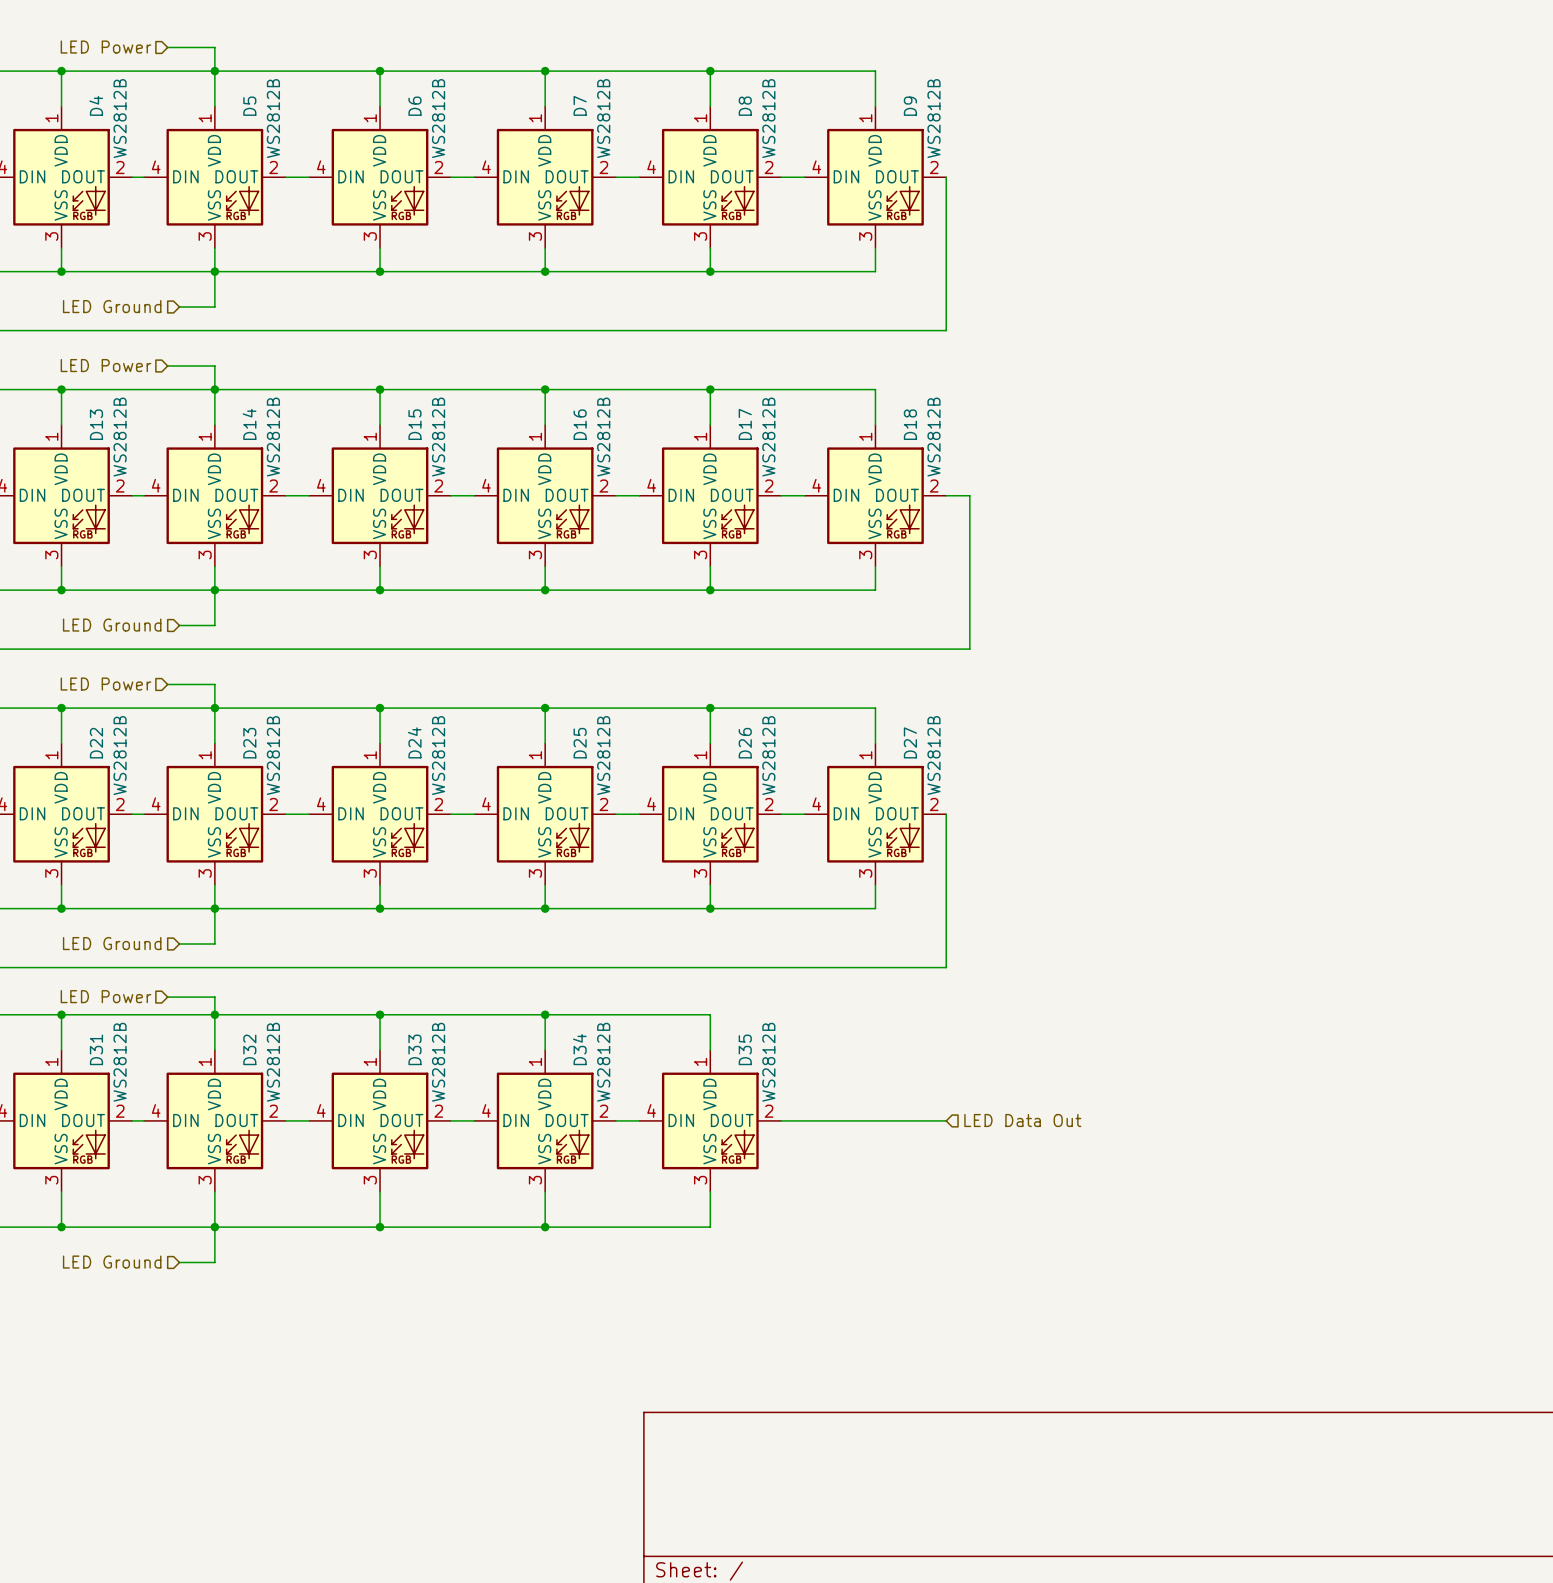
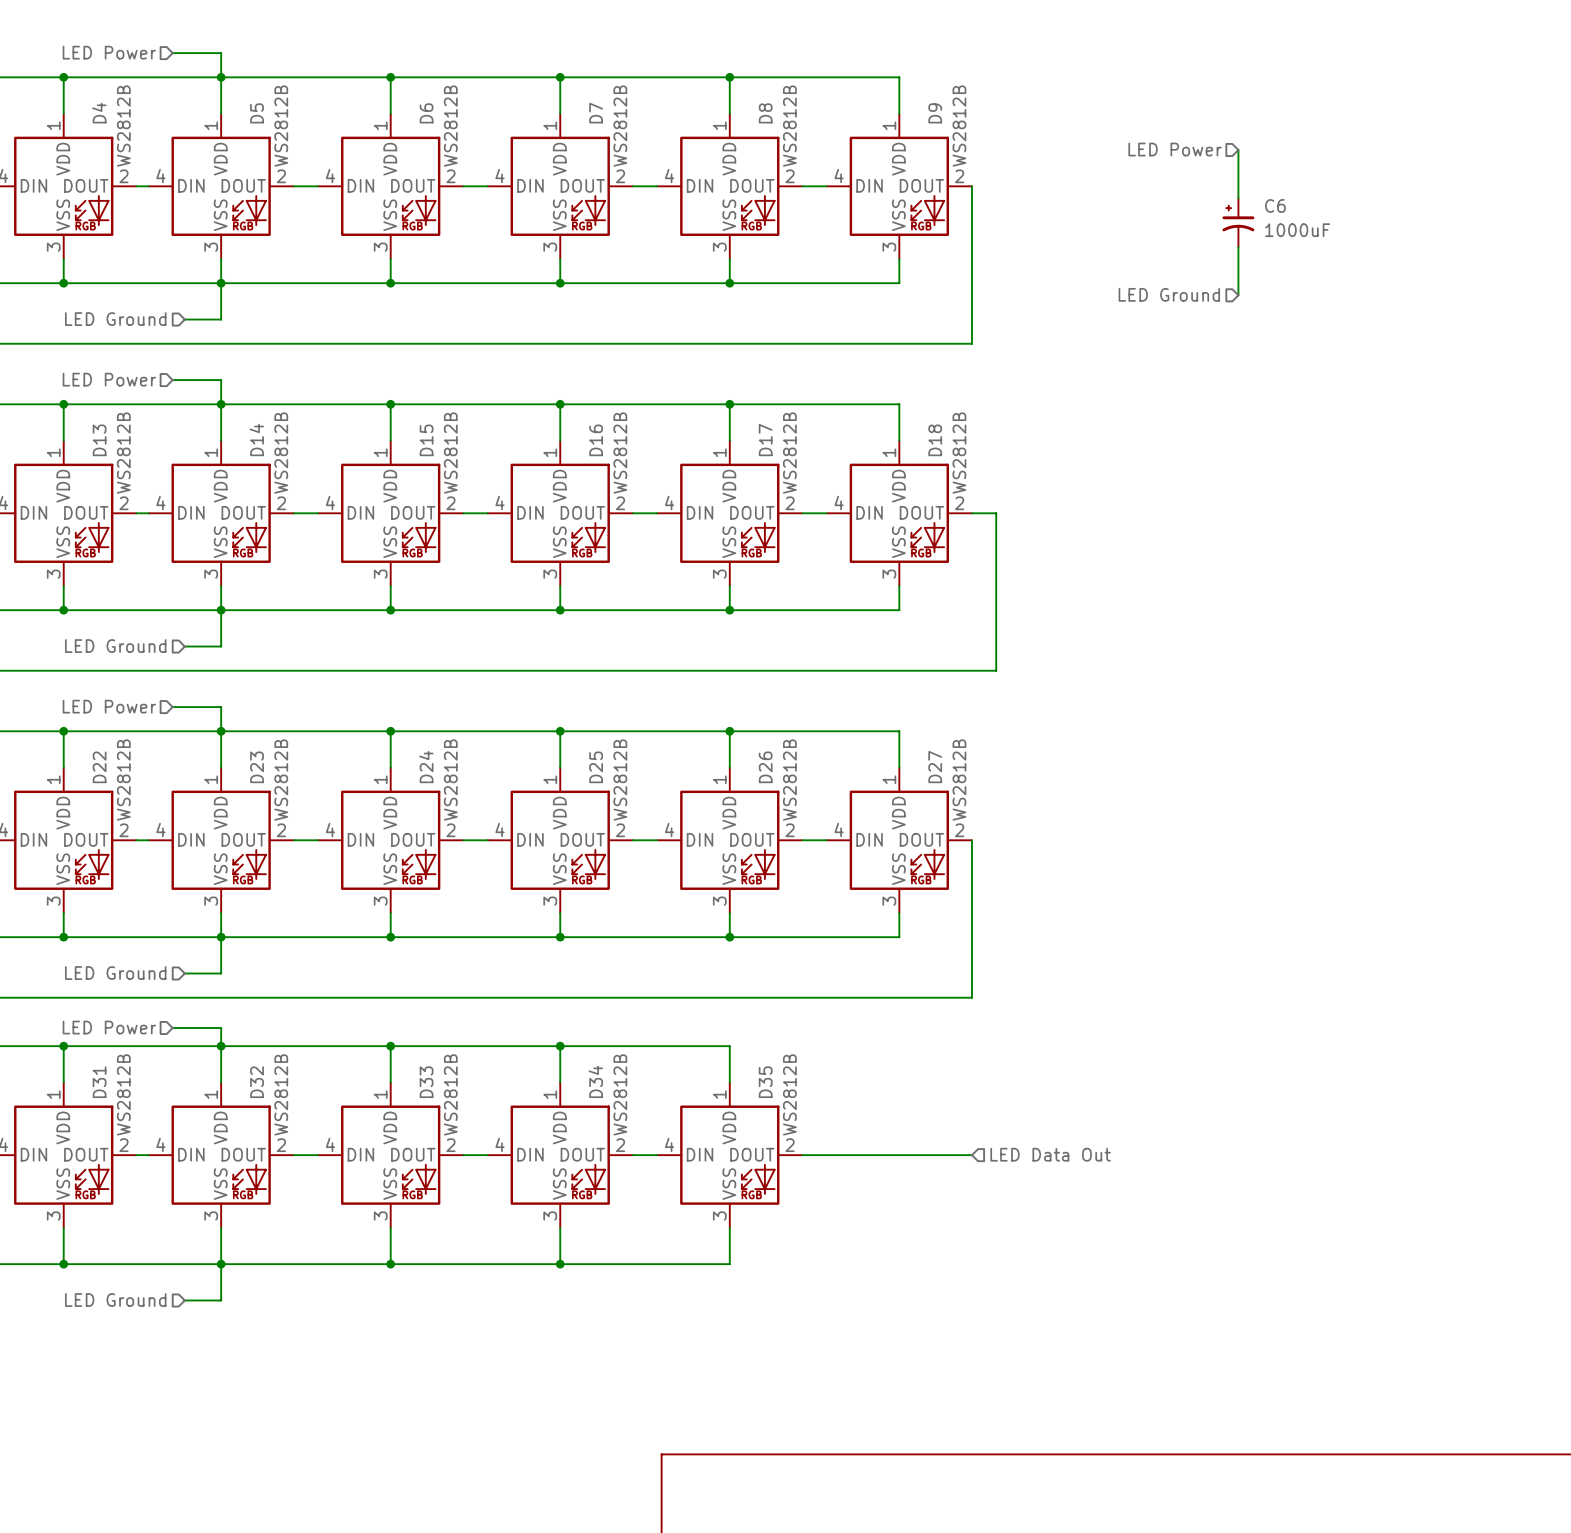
hierarchical label: none -> LED Power (1175, 149)
wire: none -> (1238, 149) (1238, 198)
C6: none -> 1000uF (1238, 222)
wire: none -> (1238, 246) (1238, 295)
hierarchical label: none -> LED Ground (1169, 294)

